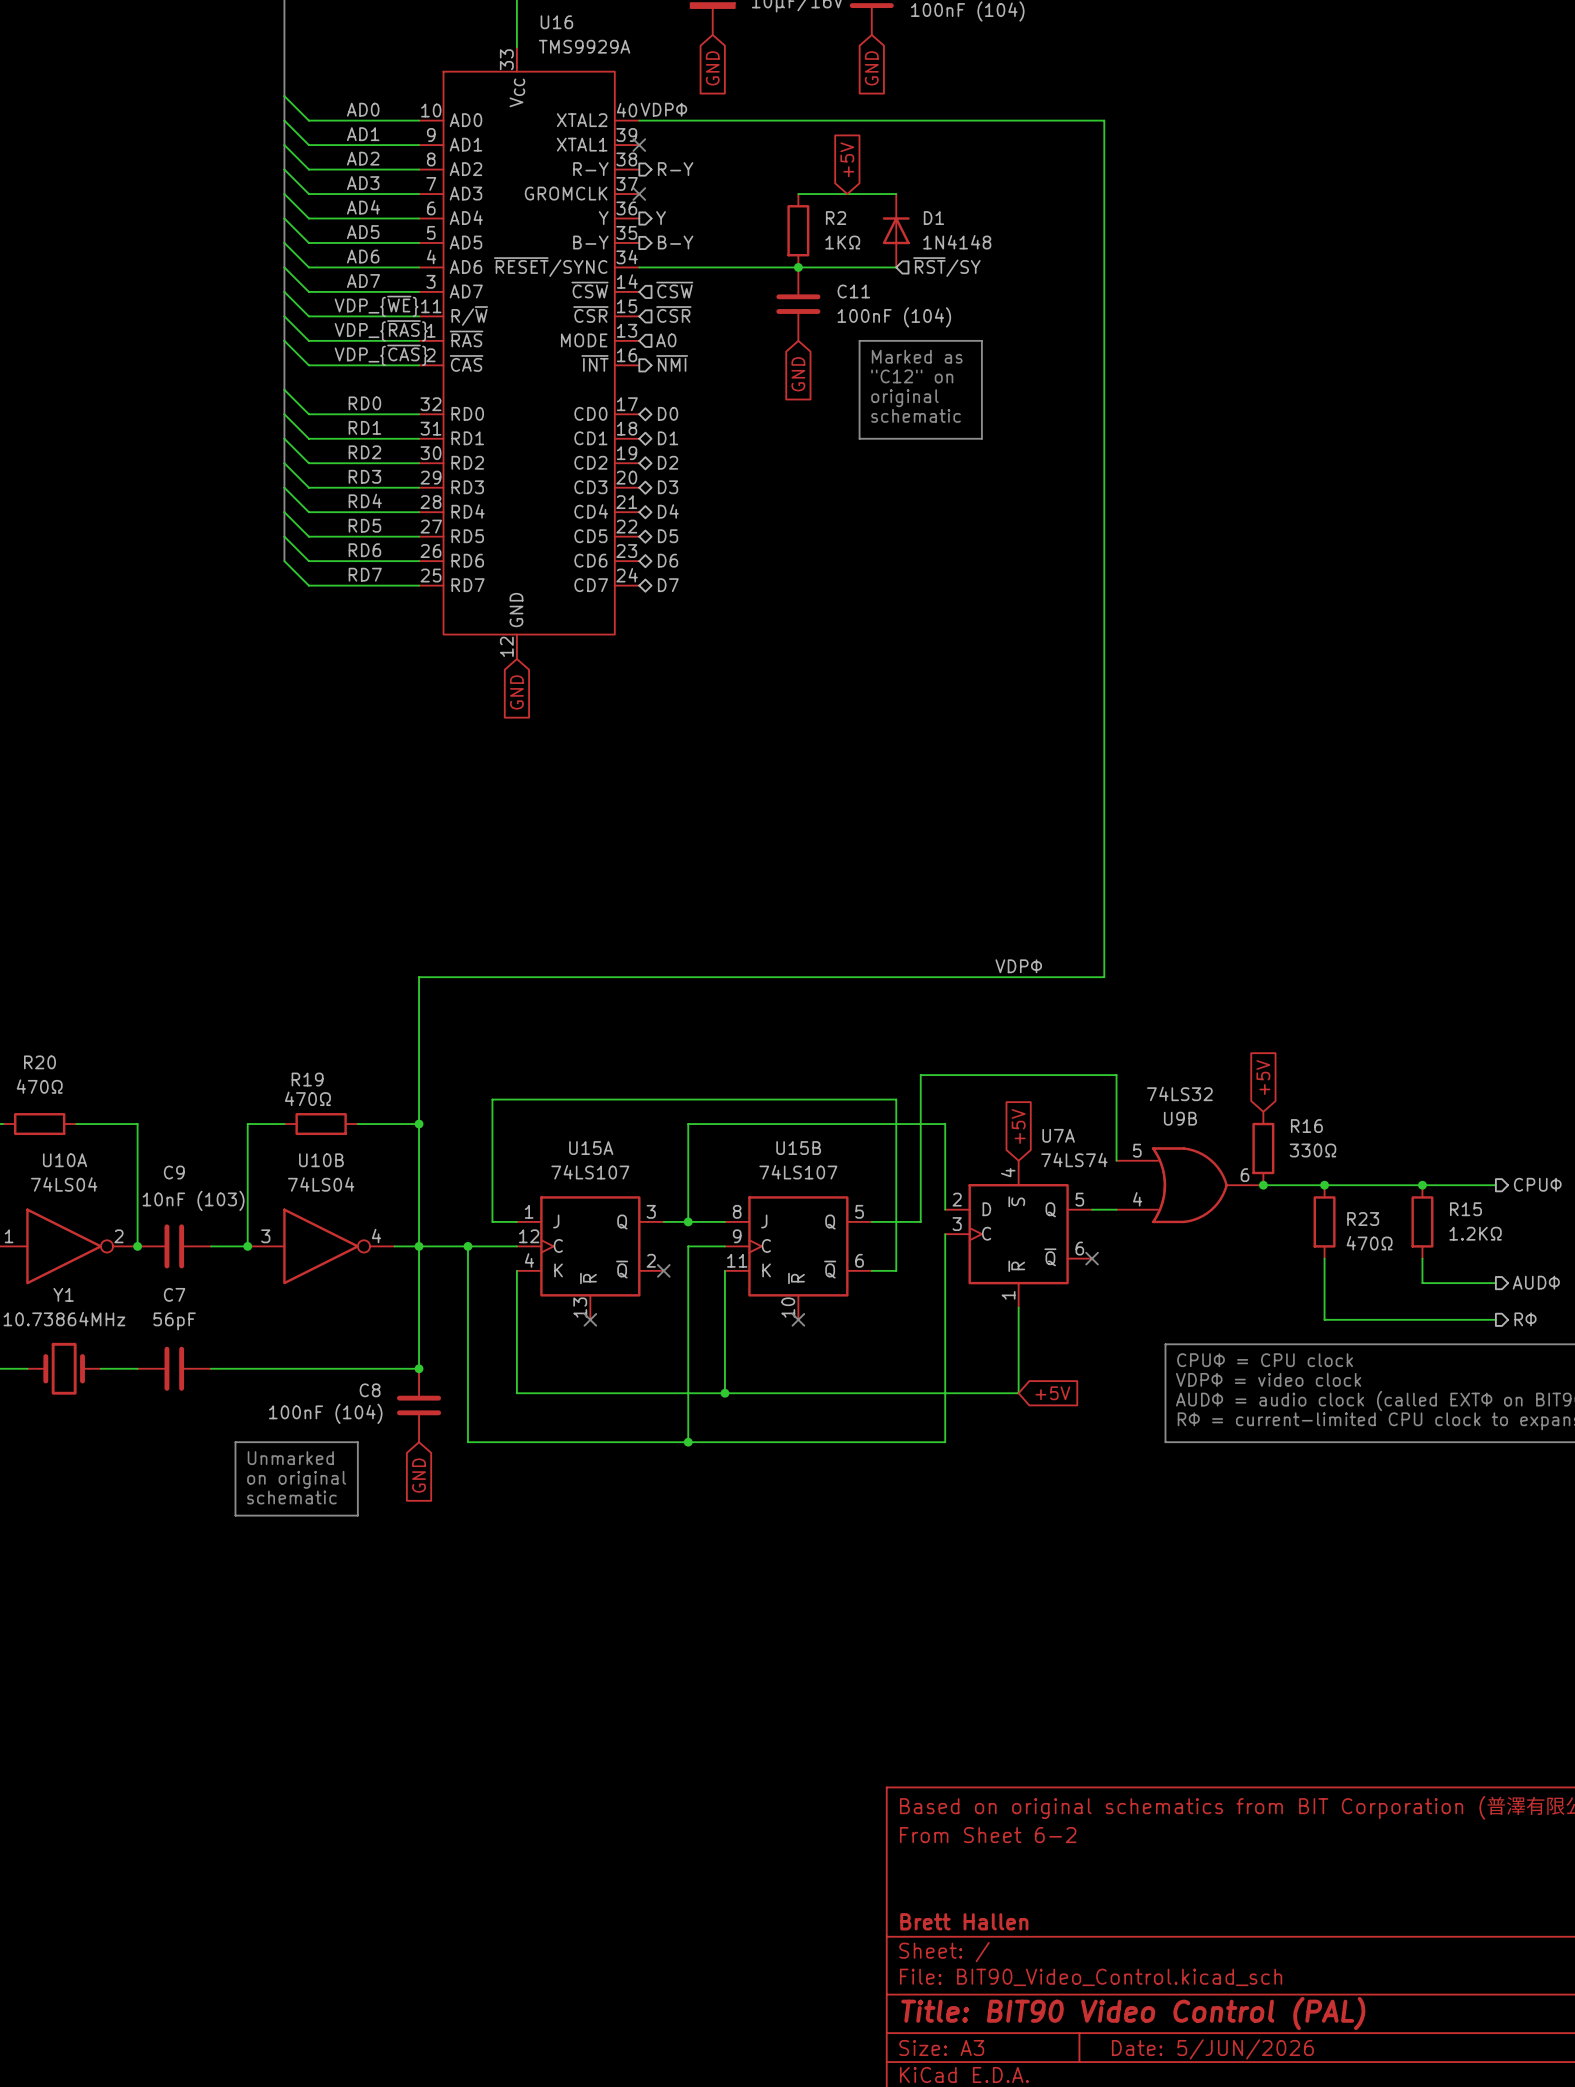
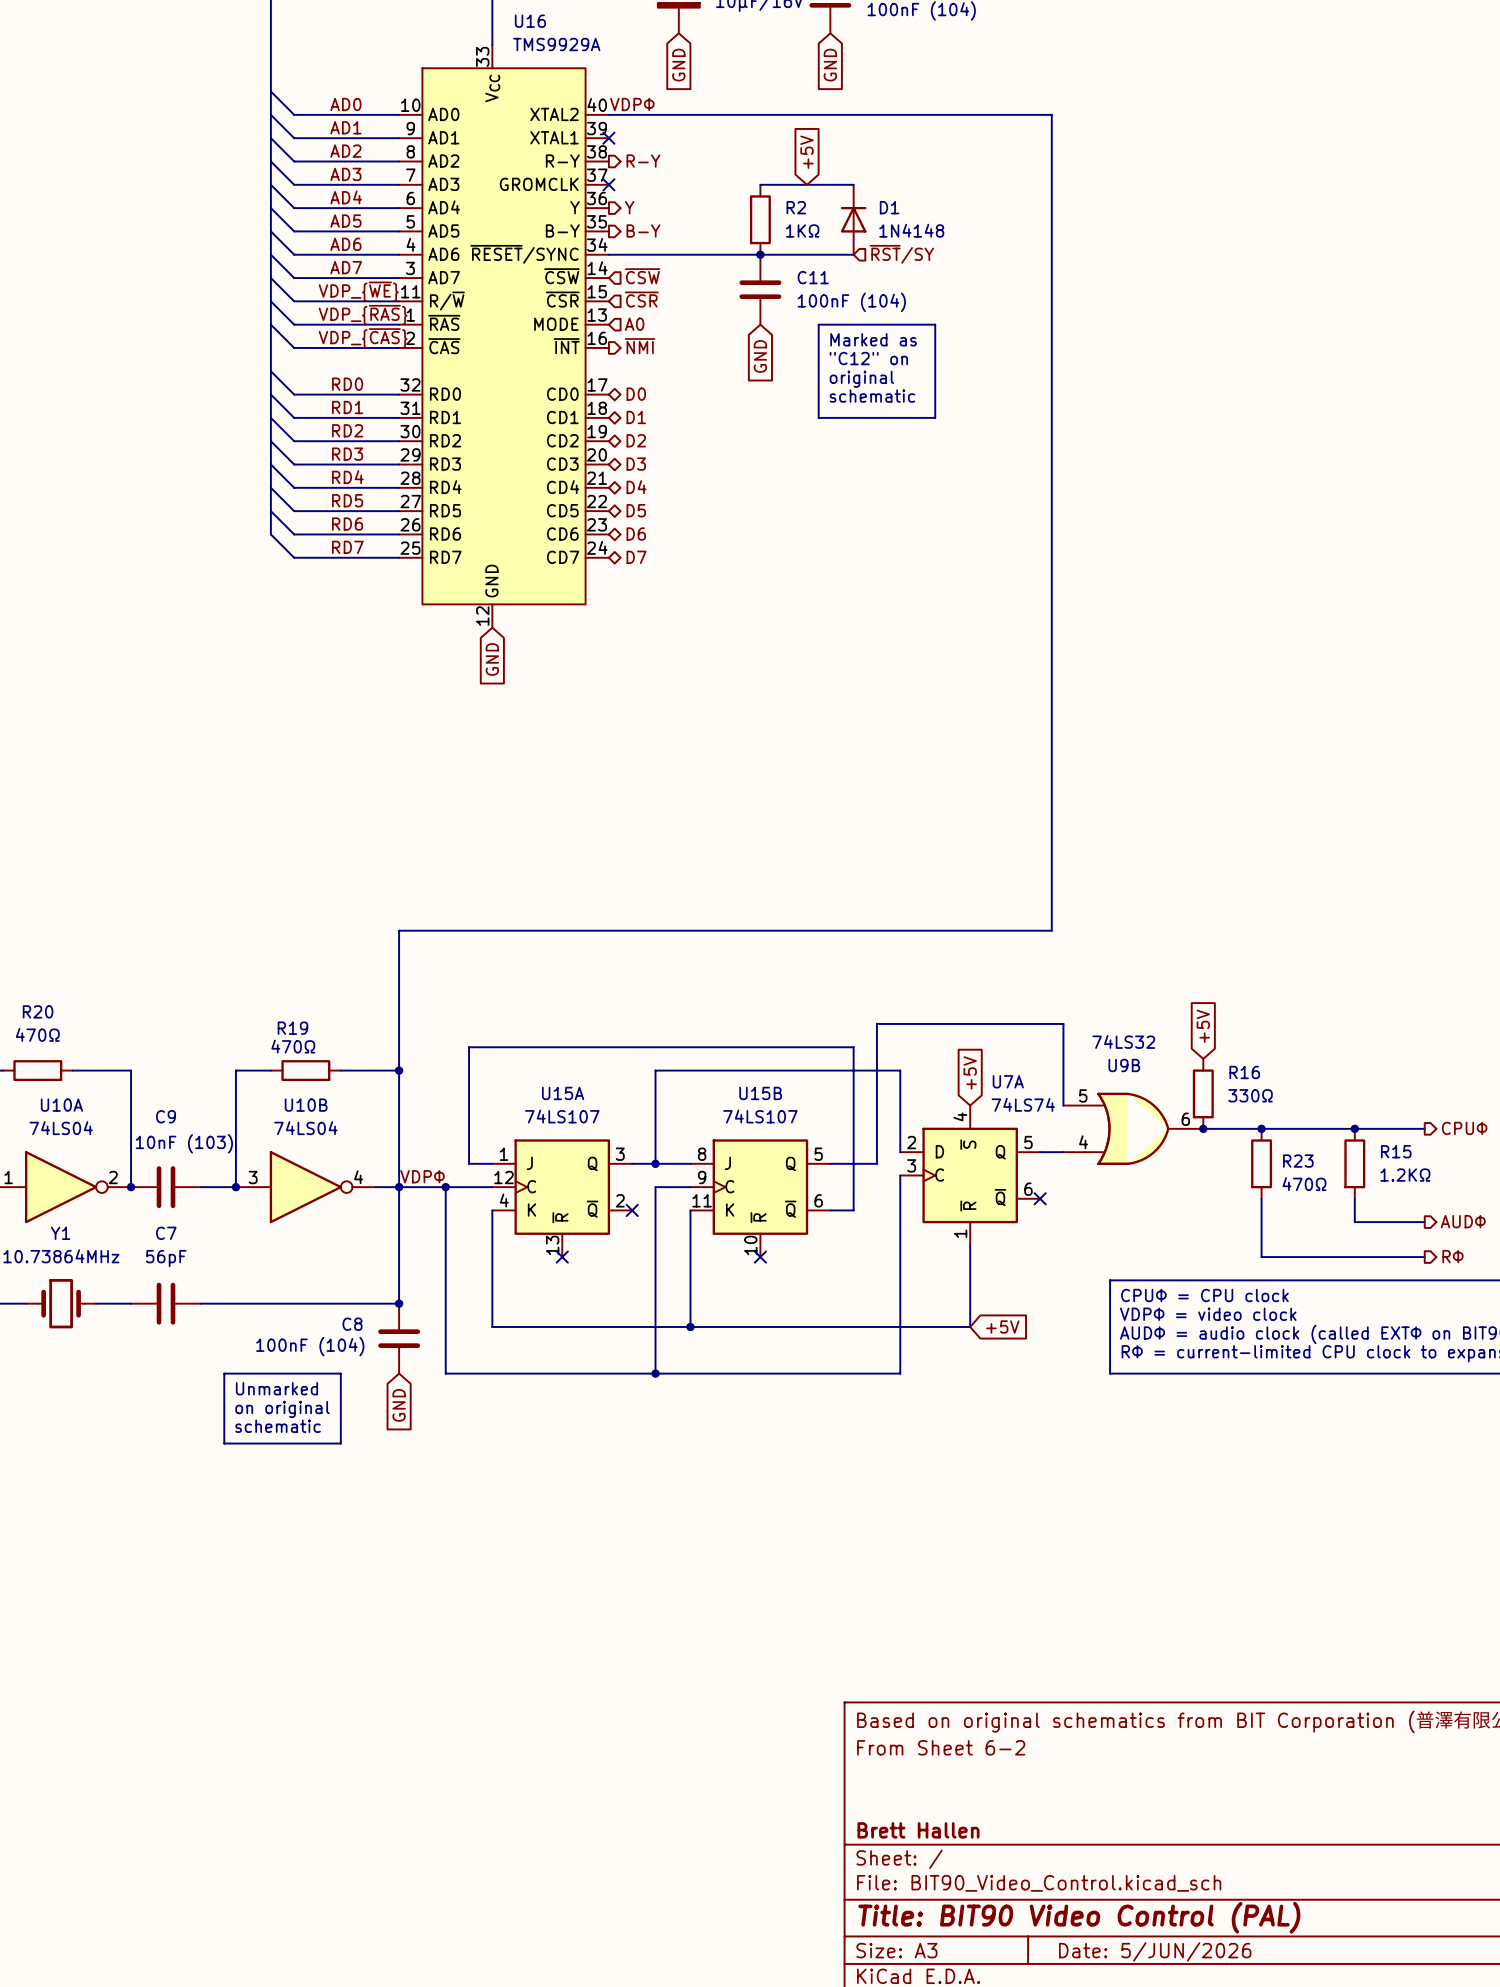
label: VDPΦ (1018, 966) -> none
label: none -> VDPΦ (422, 1176)

